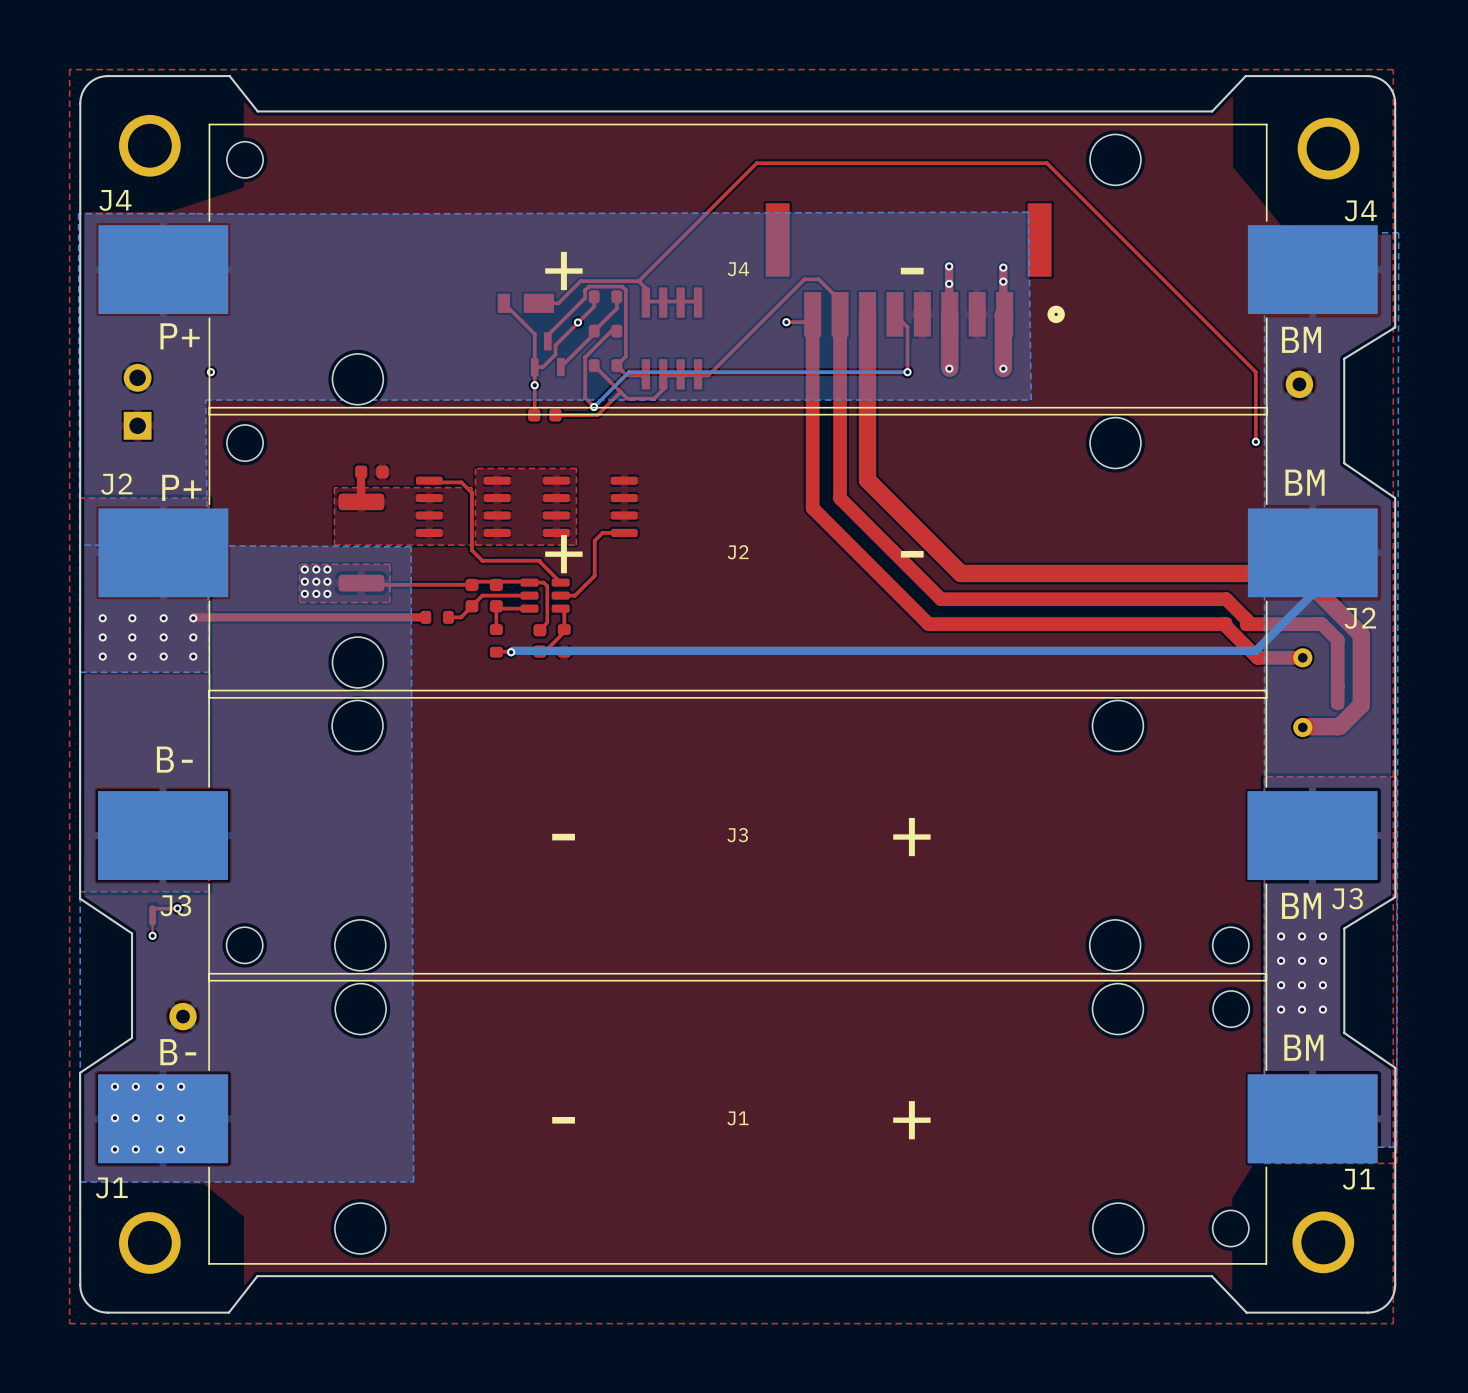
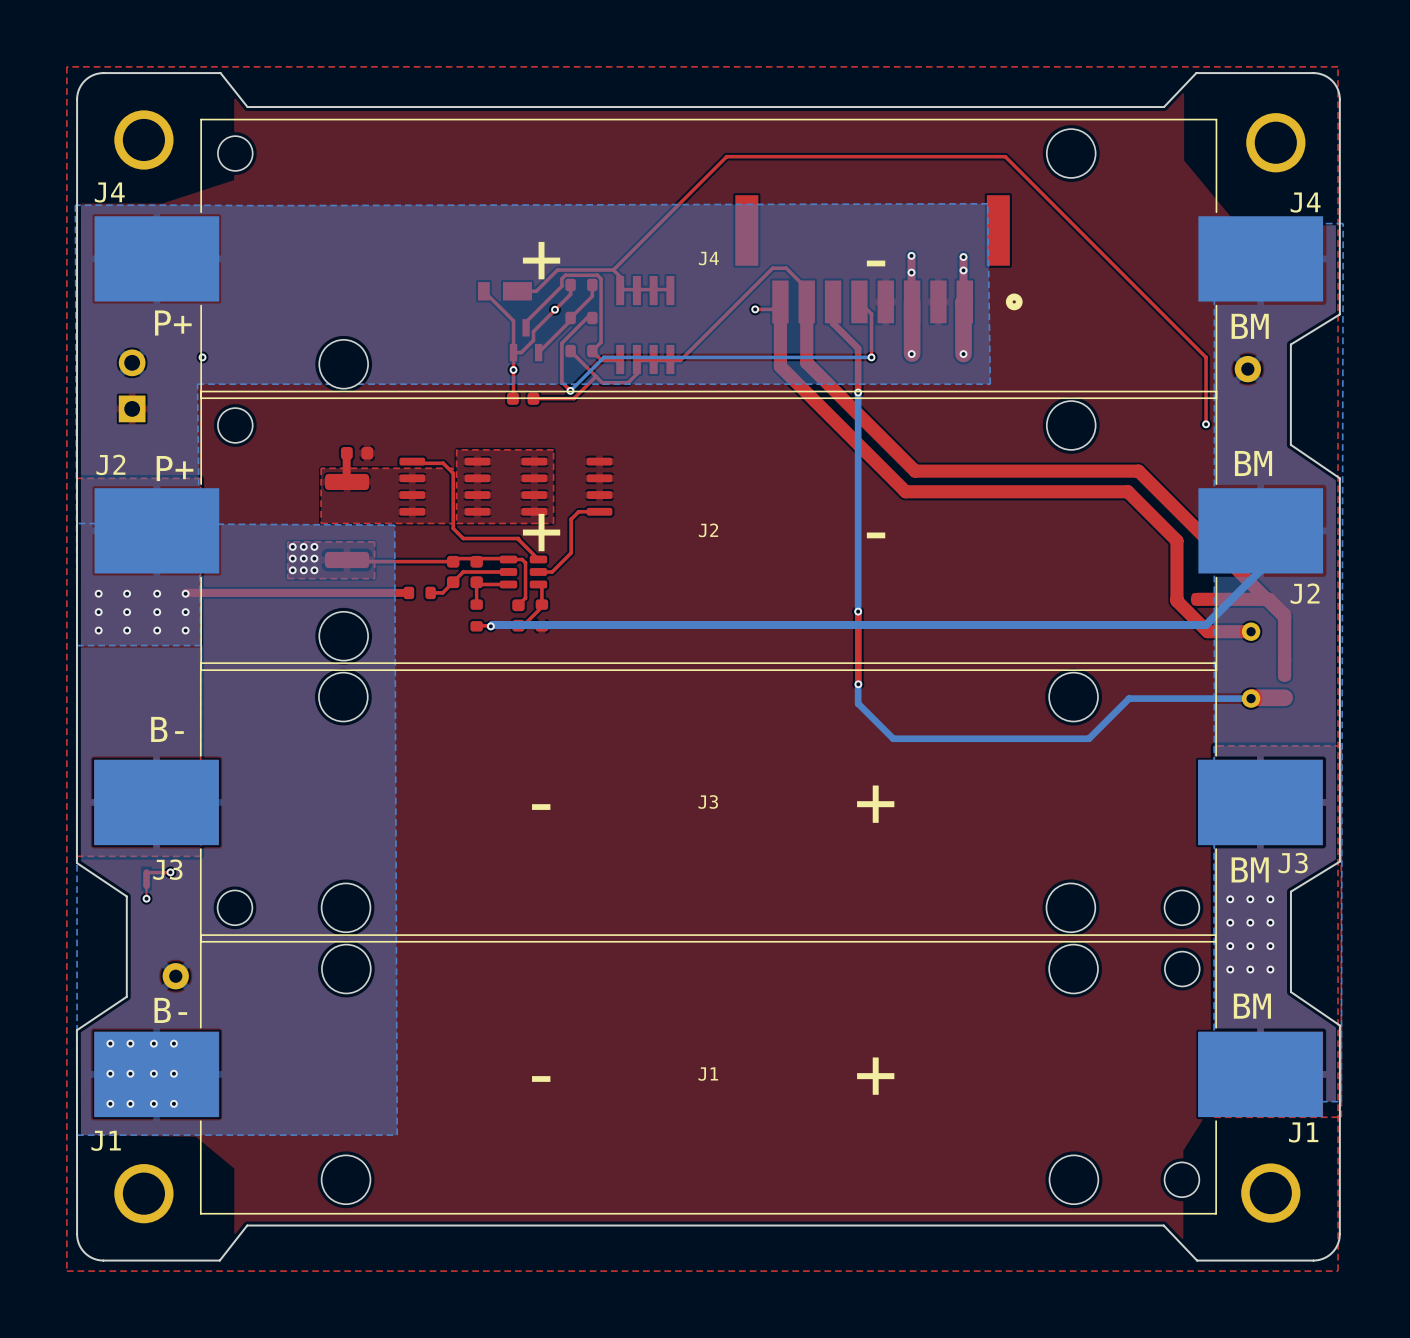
top track: (867, 336) (867, 480) (960, 573) (1300, 573) (1361, 634) (1361, 705) (1340, 726) (1337, 726) -> (833, 323) (858, 348) (858, 392)
top track: (840, 377) (840, 498) (941, 599) (1226, 599) (1246, 619) (1246, 624) -> (806, 362) (915, 471) (1138, 471) (1284, 617)
top track: (812, 381) (812, 508) (928, 624) (1225, 624) -> (780, 366) (905, 491) (1127, 491) (1176, 540) (1176, 599)
bottom track: none -> (858, 392) (858, 611)
via: none -> (858, 392)
top track: none -> (858, 611) (858, 684)
via: none -> (858, 611)
bottom track: none -> (858, 684) (858, 703) (893, 738) (1088, 738) (1129, 698) (1244, 698)
via: none -> (858, 684)

